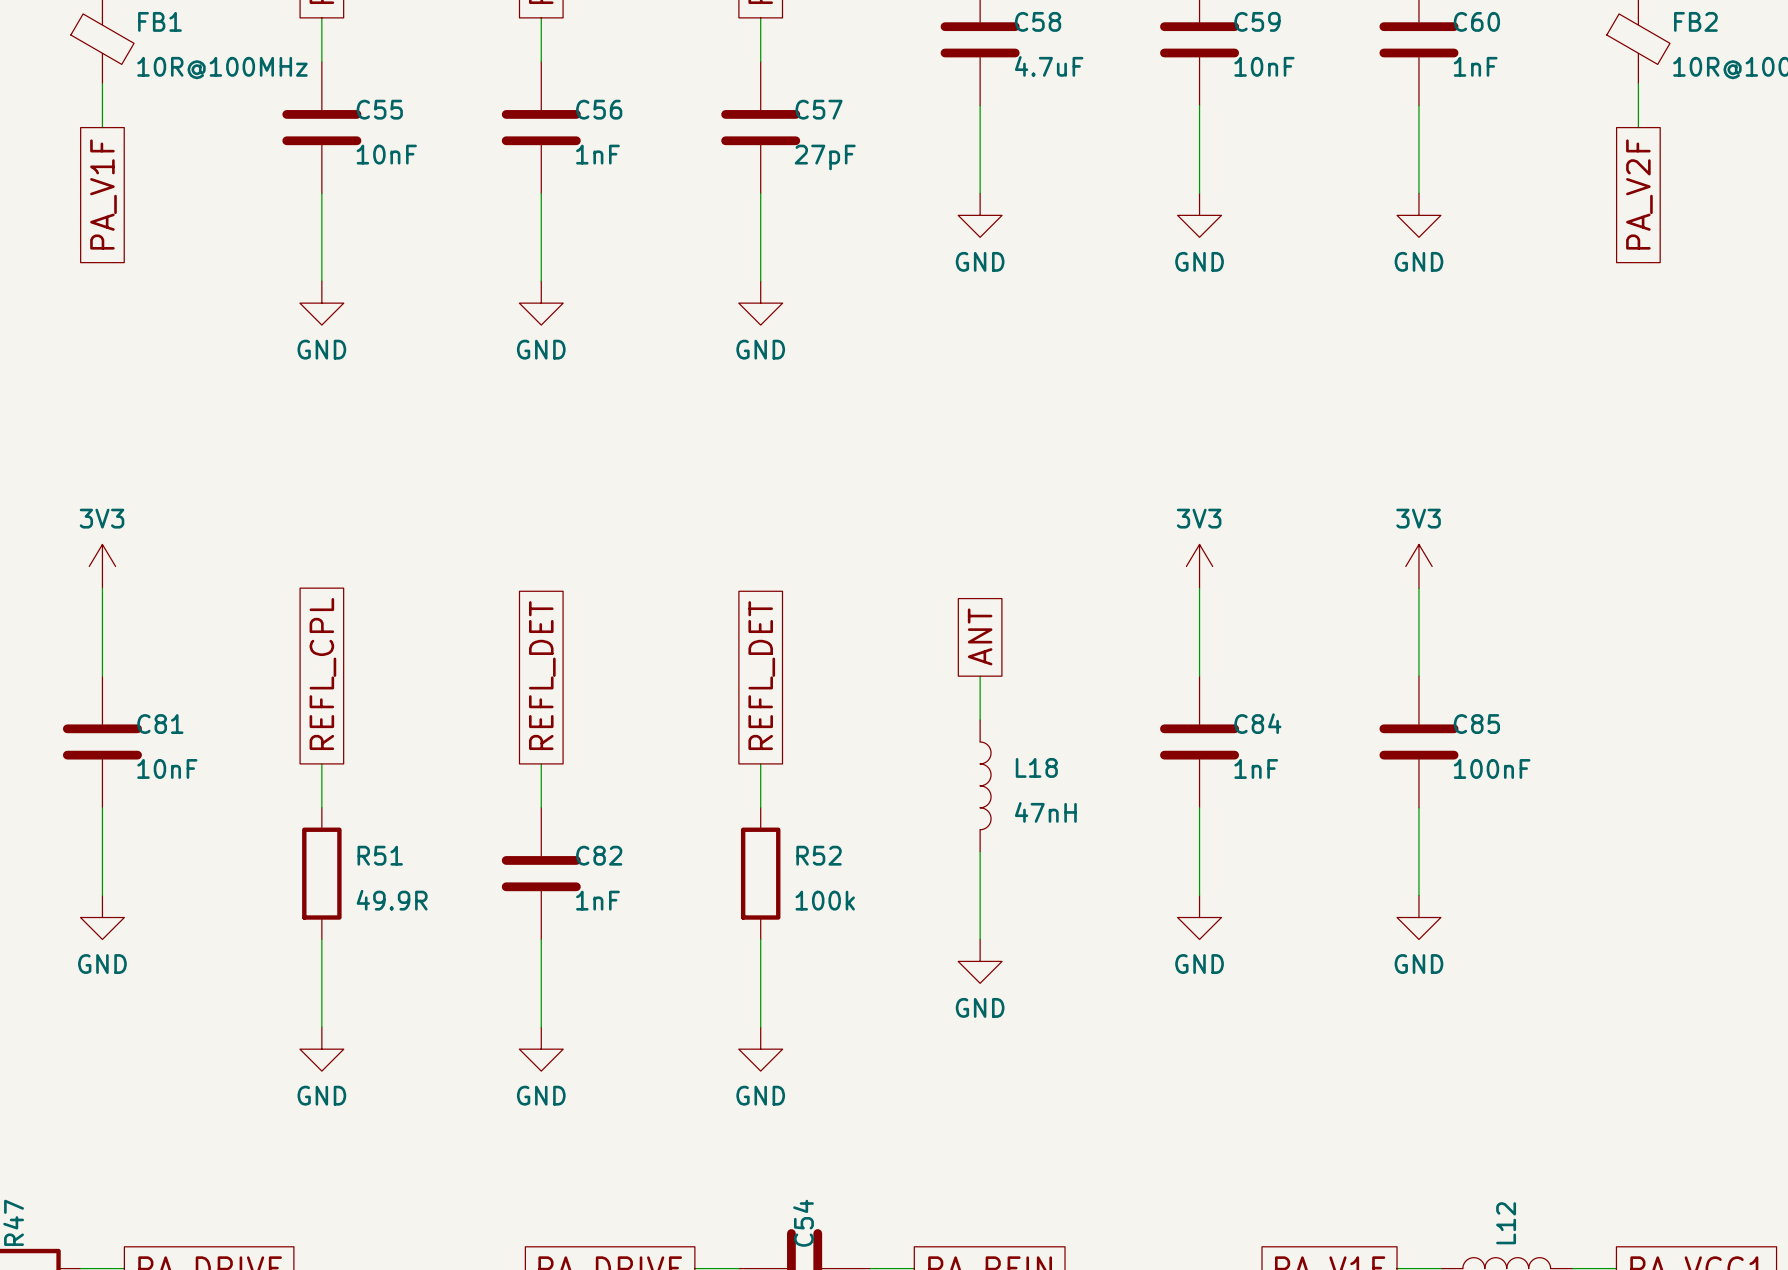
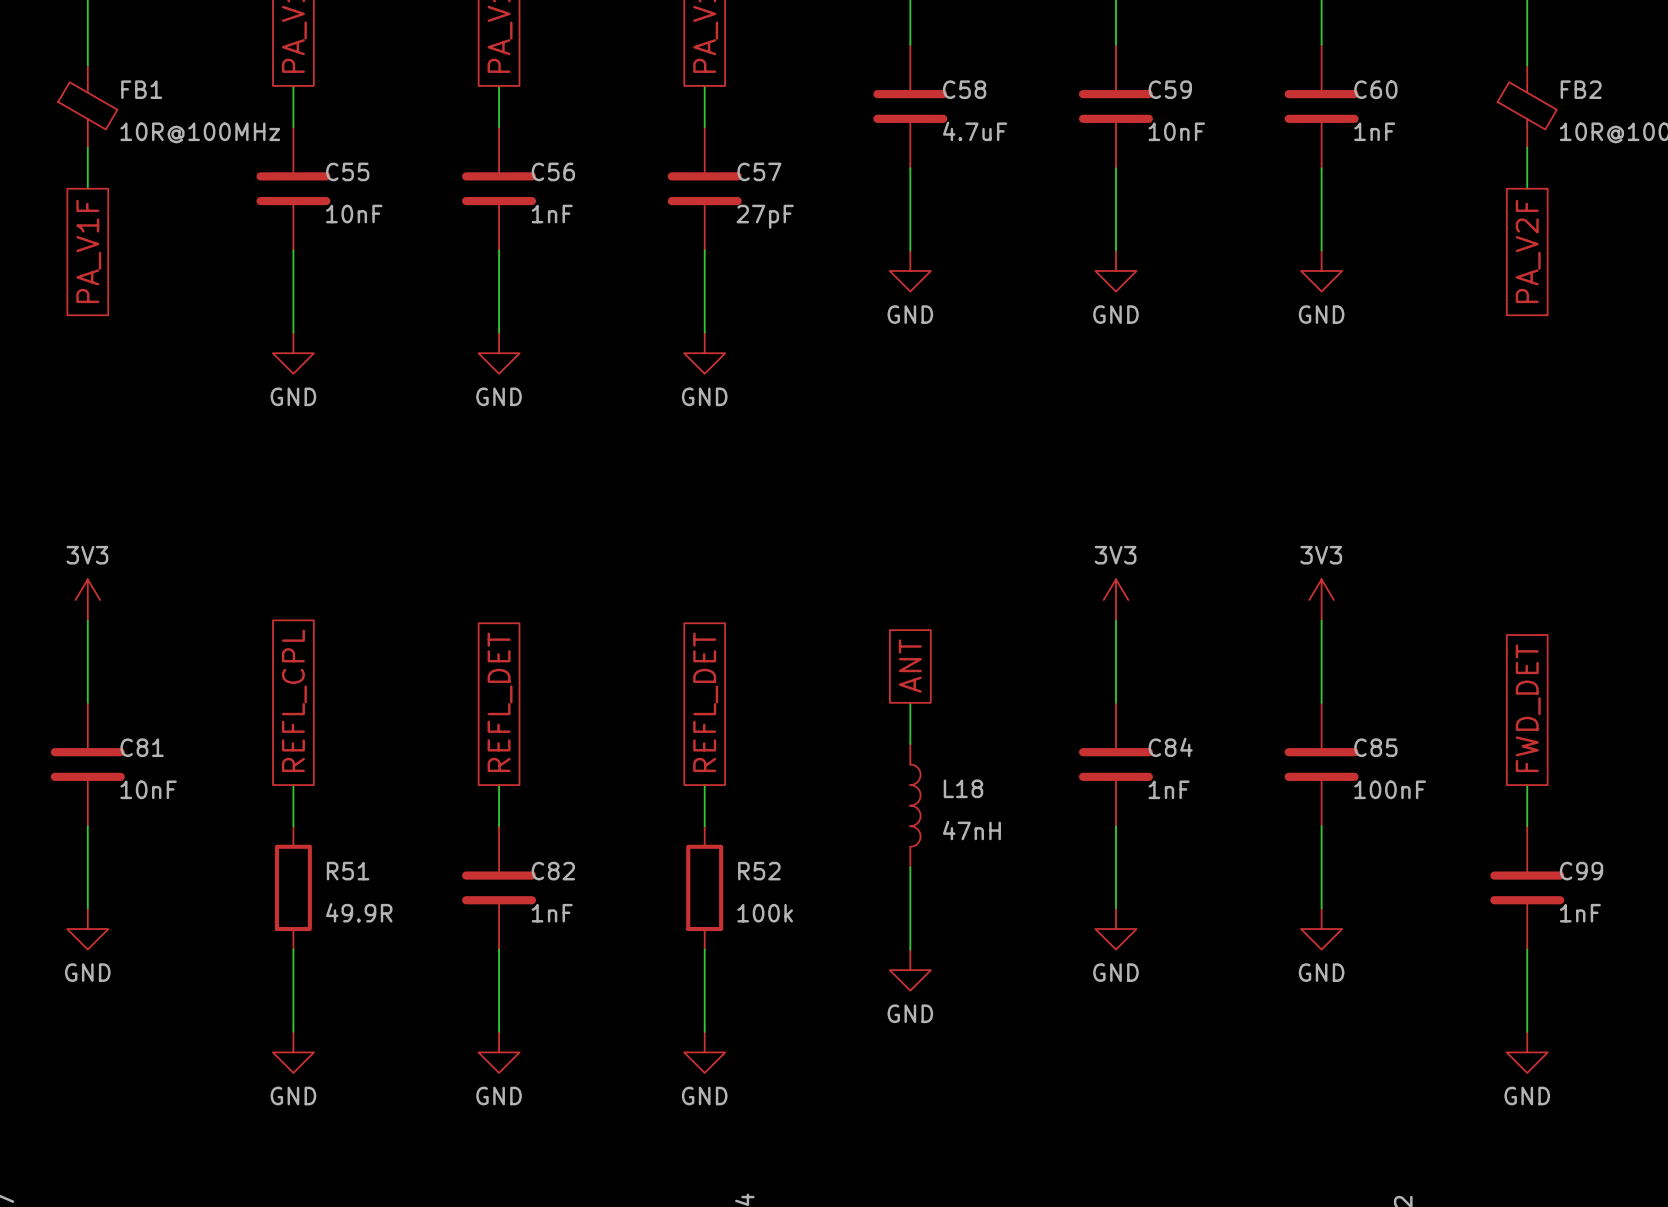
global label: none -> FWD_DET (1528, 708)
wire: none -> (1527, 785) (1527, 826)
C99: none -> 1nF (1527, 887)
wire: none -> (1527, 949) (1527, 1031)
power symbol: none -> GND (1527, 1052)

